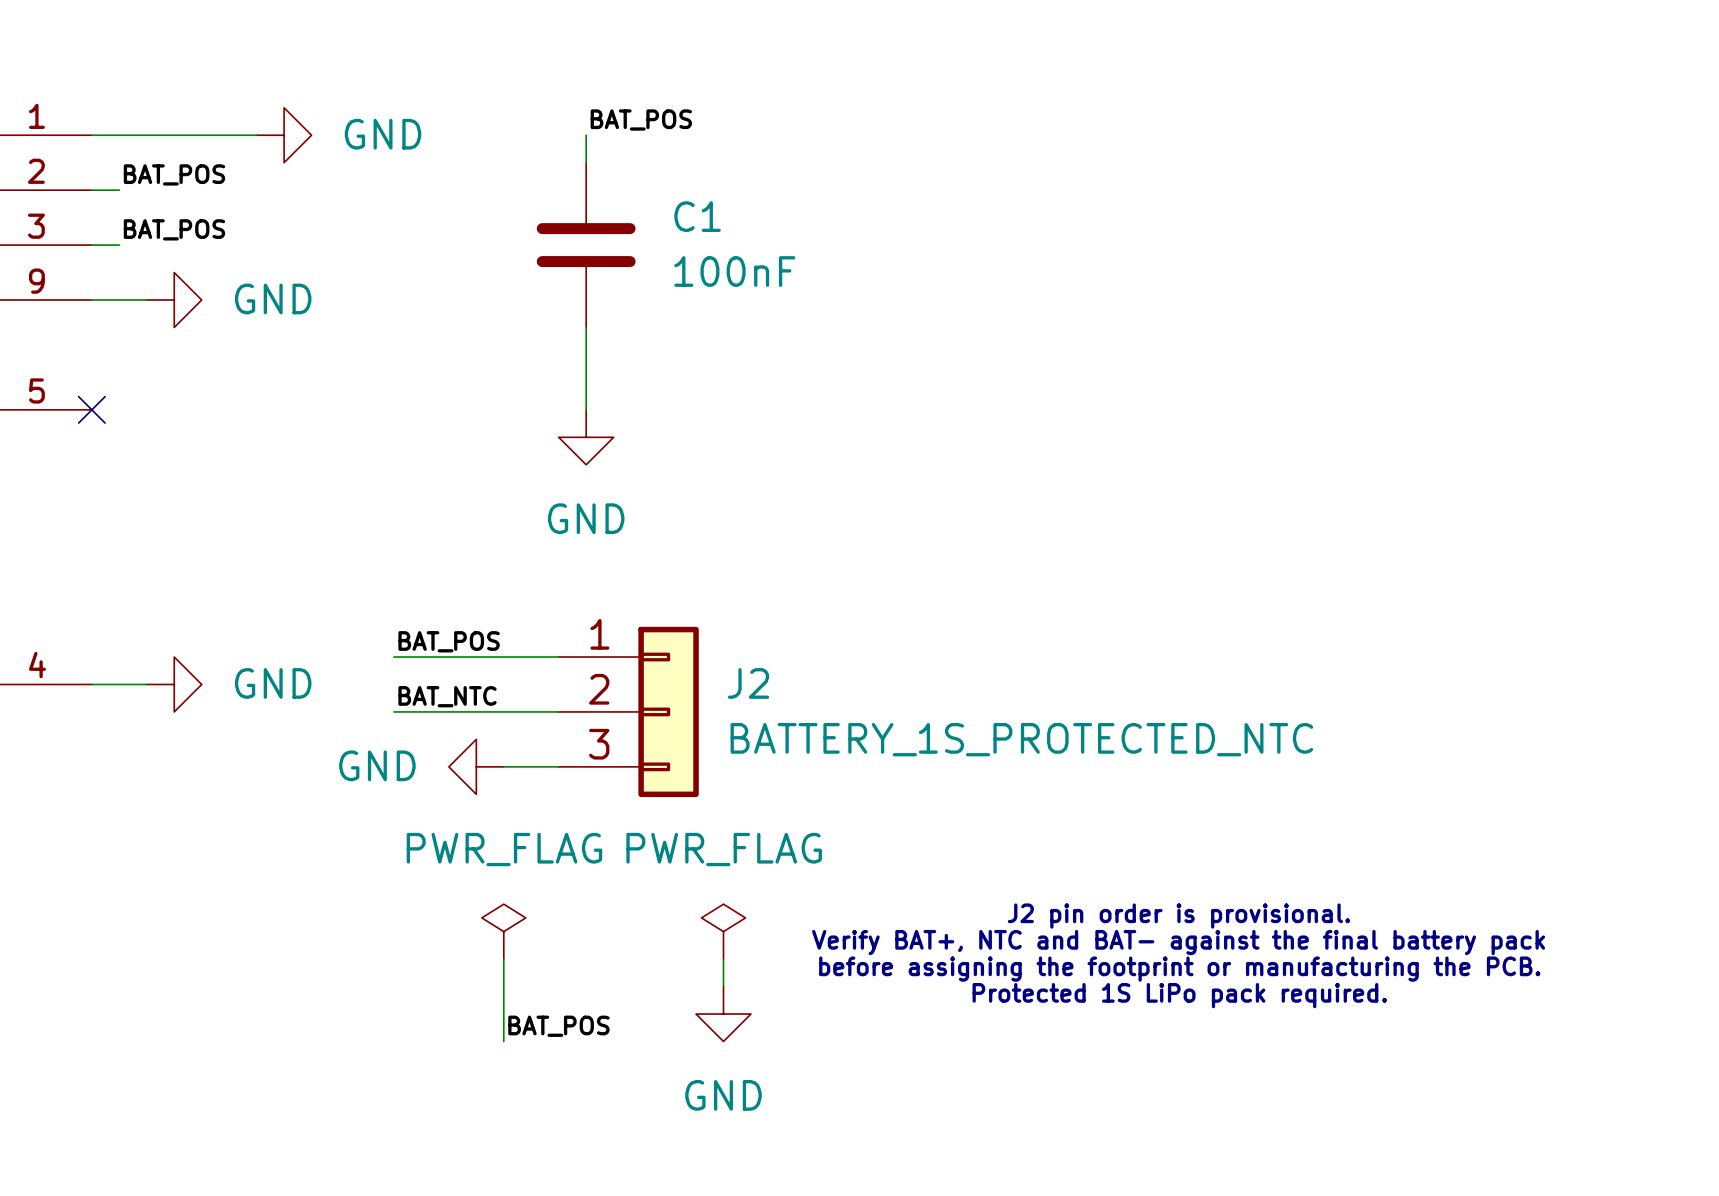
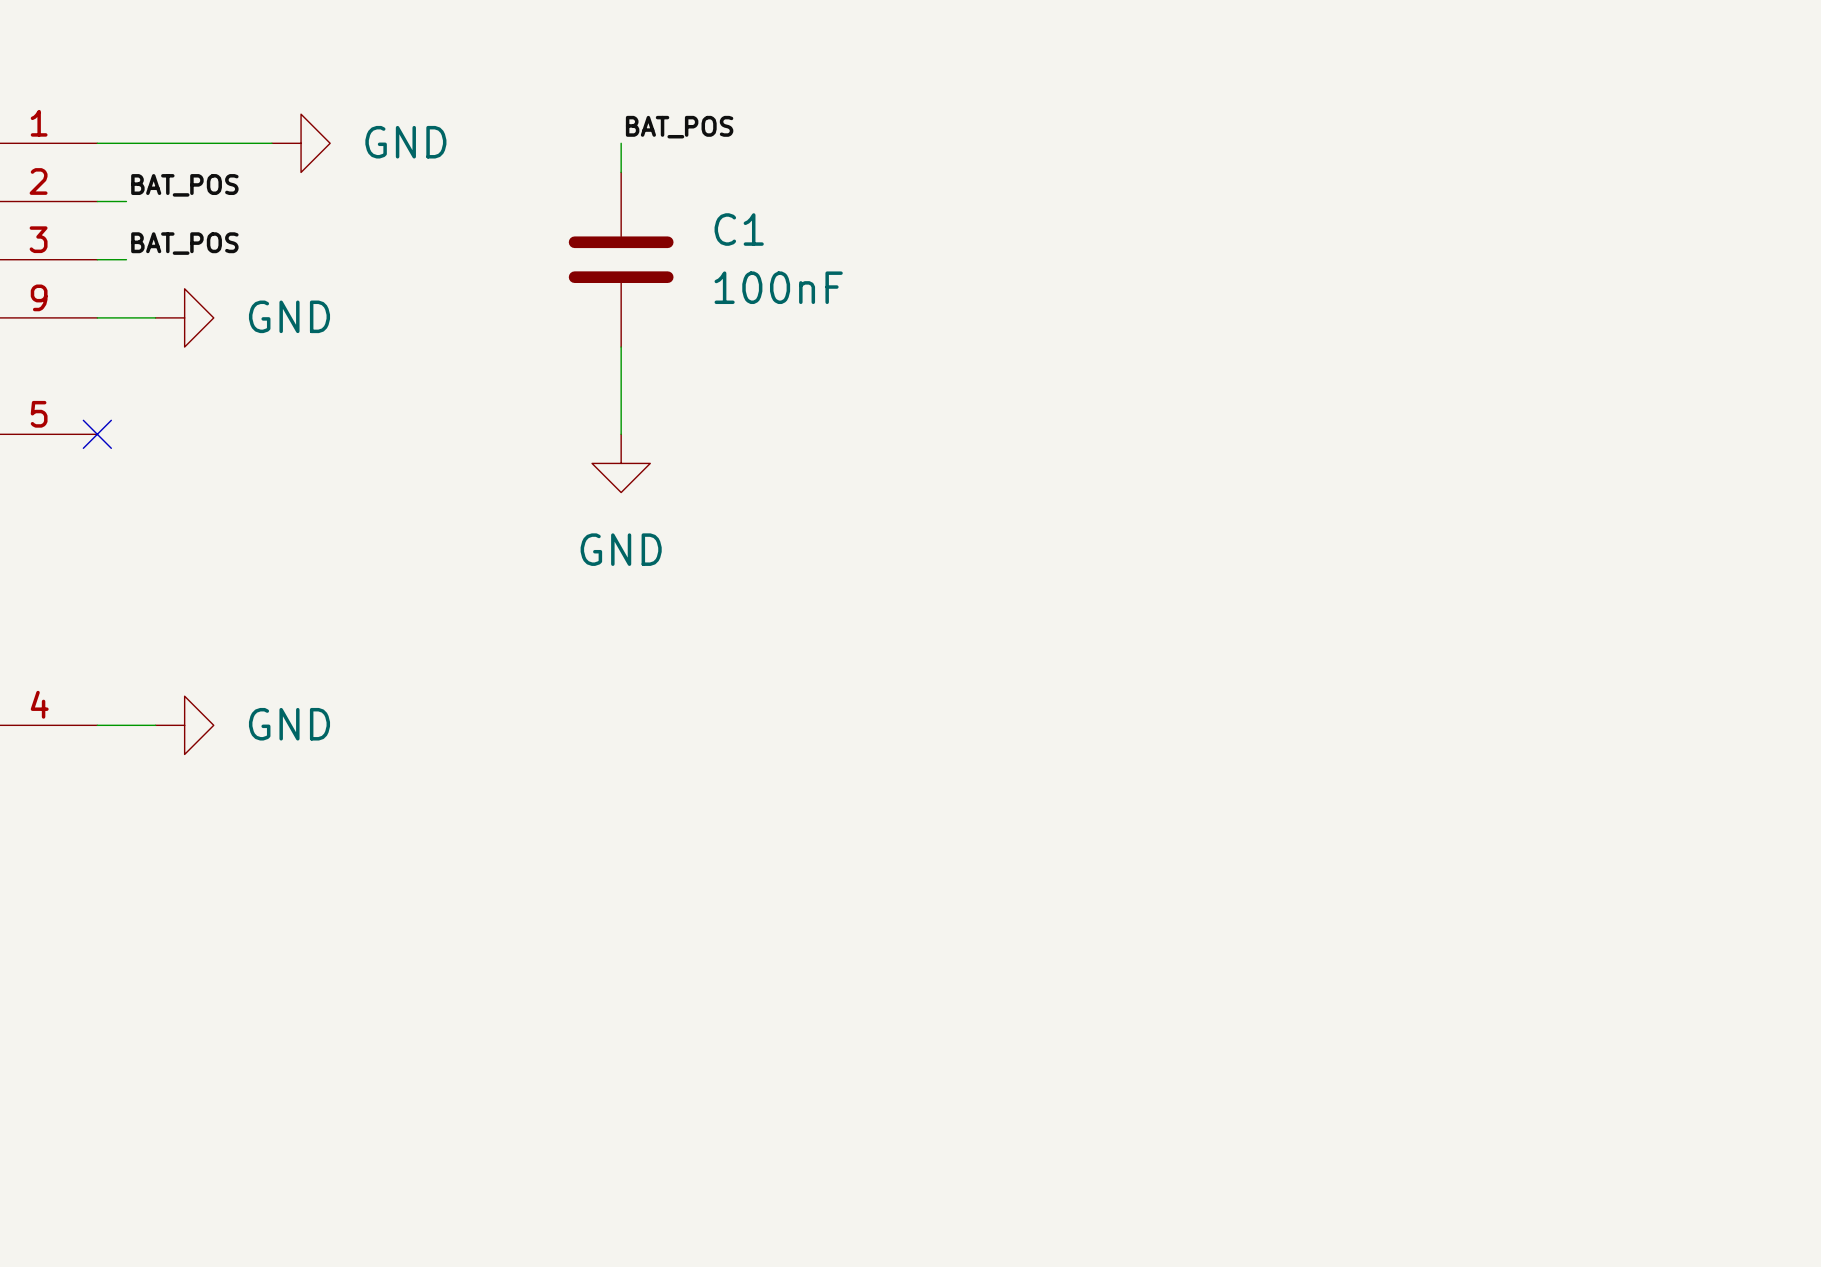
label: BAT_POS (449, 641) -> none
wire: (393, 657) (558, 657) -> none
label: BAT_NTC (447, 696) -> none
wire: (393, 711) (558, 711) -> none
J2: BATTERY_1S_PROTECTED_NTC (628, 711) -> none
power symbol: GND (476, 766) -> none
wire: (503, 766) (558, 766) -> none
text: J2 pin order is provisional. (1178, 916) -> none
power symbol: PWR_FLAG (503, 931) -> none
power symbol: PWR_FLAG (723, 931) -> none
text: Verify BAT+, NTC and BAT- against the final battery pack (1178, 942) -> none
wire: (503, 959) (503, 1041) -> none
wire: (723, 959) (723, 986) -> none
text: before assigning the footprint or manufacturing the PCB. (1179, 969) -> none
text: Protected 1S LiPo pack required. (1179, 995) -> none
power symbol: GND (723, 1014) -> none
label: BAT_POS (558, 1026) -> none

